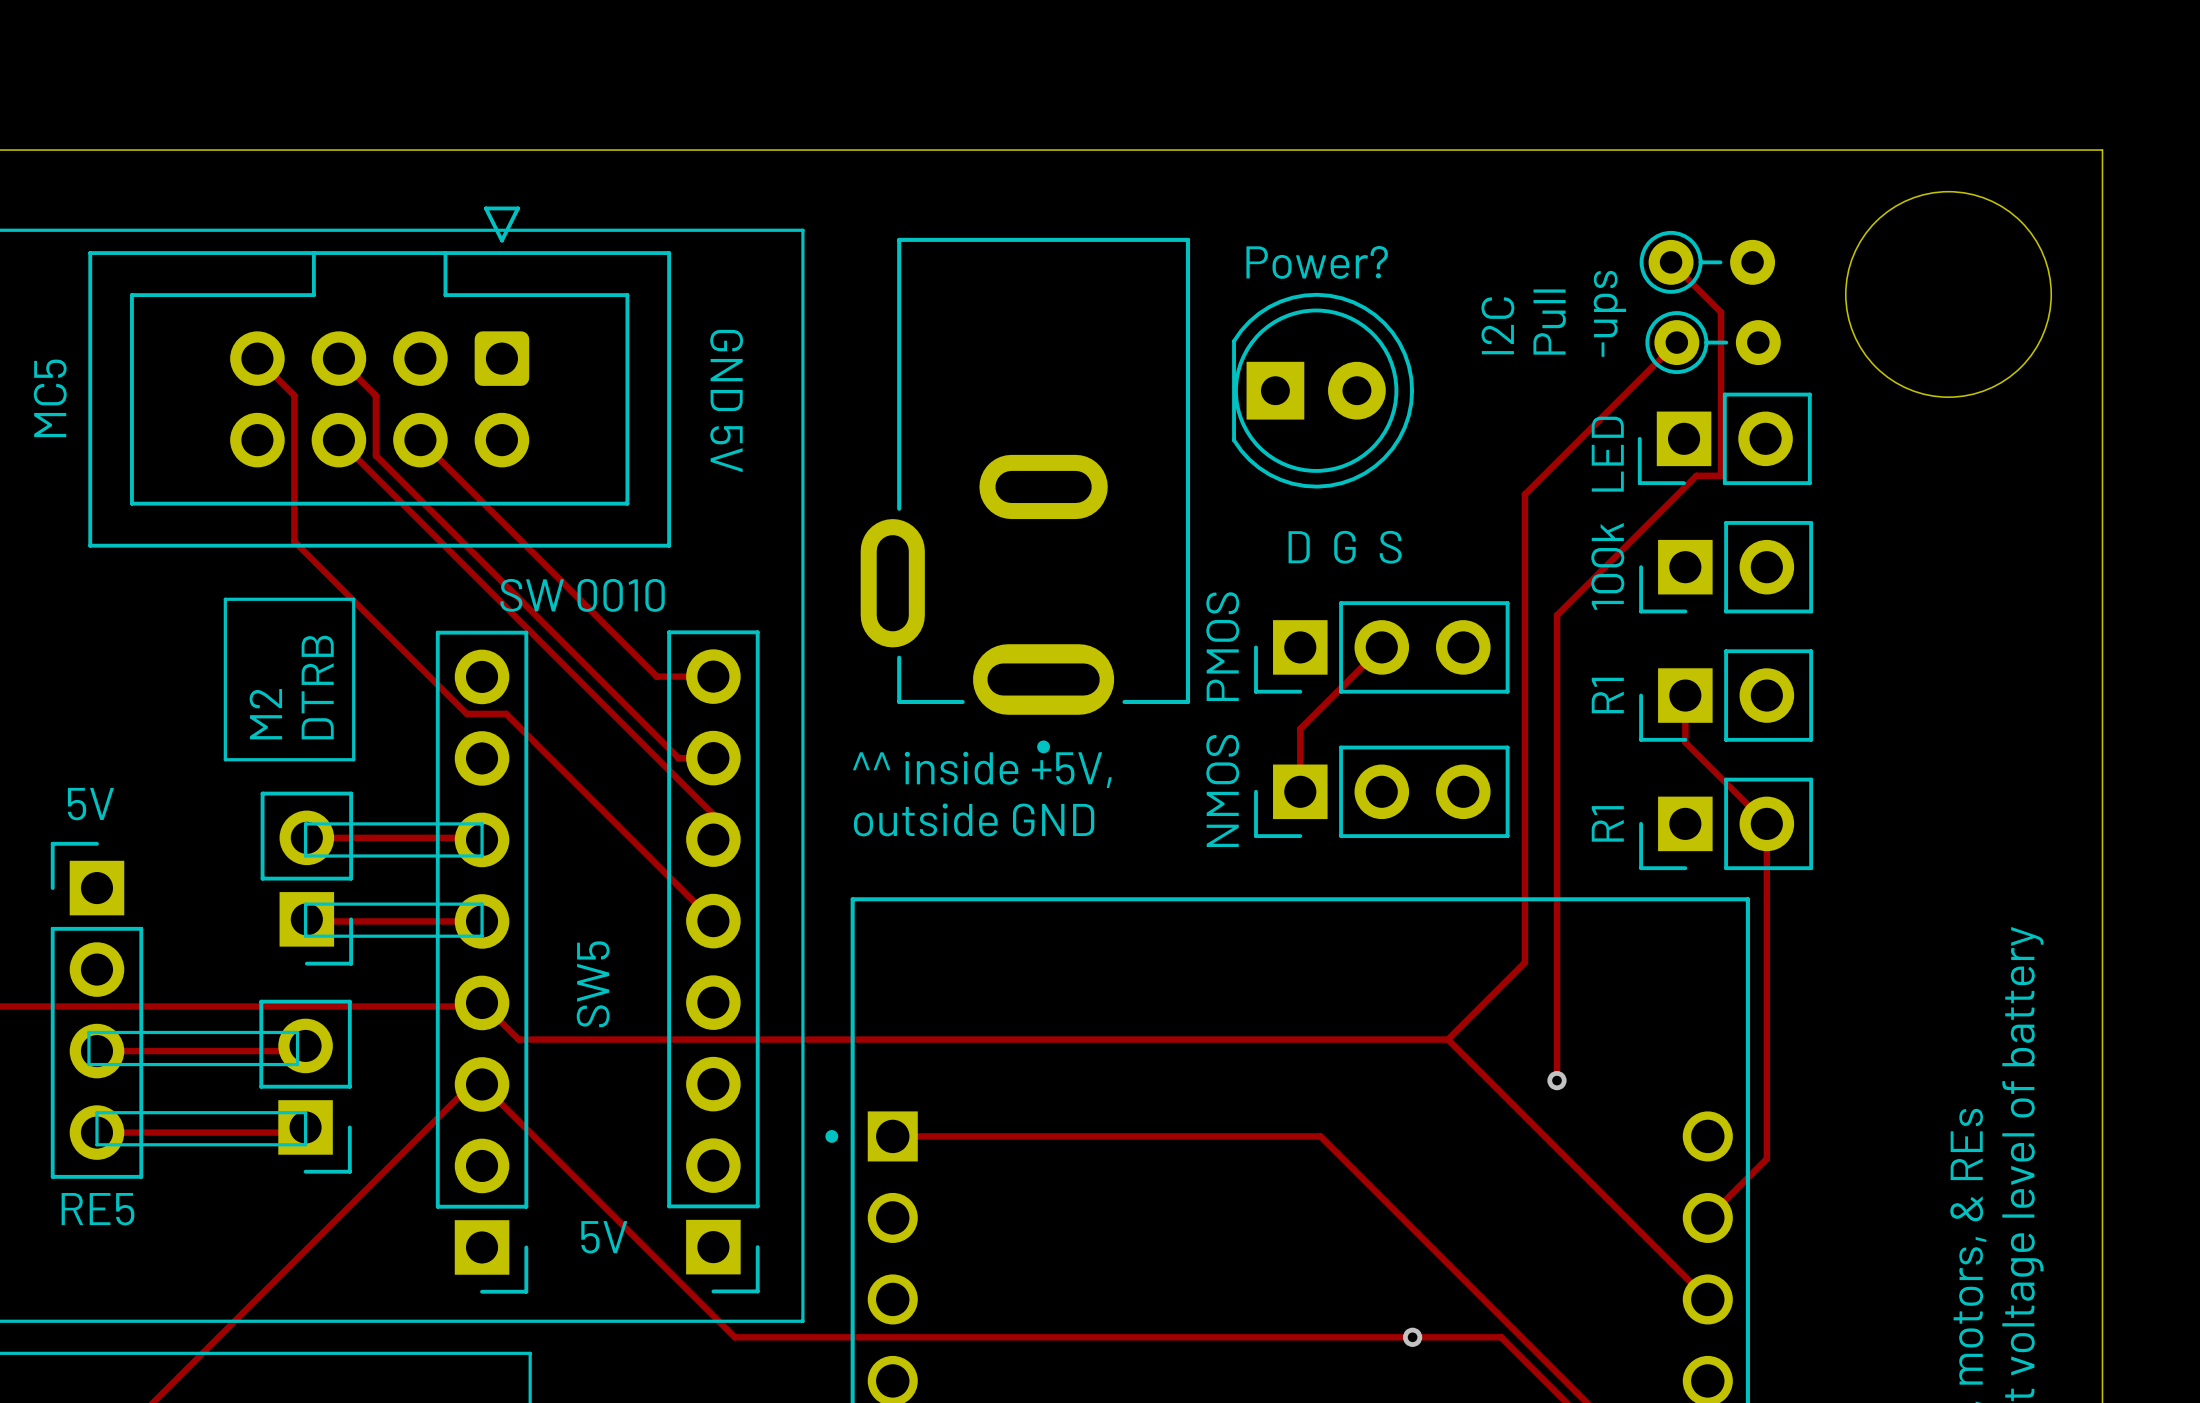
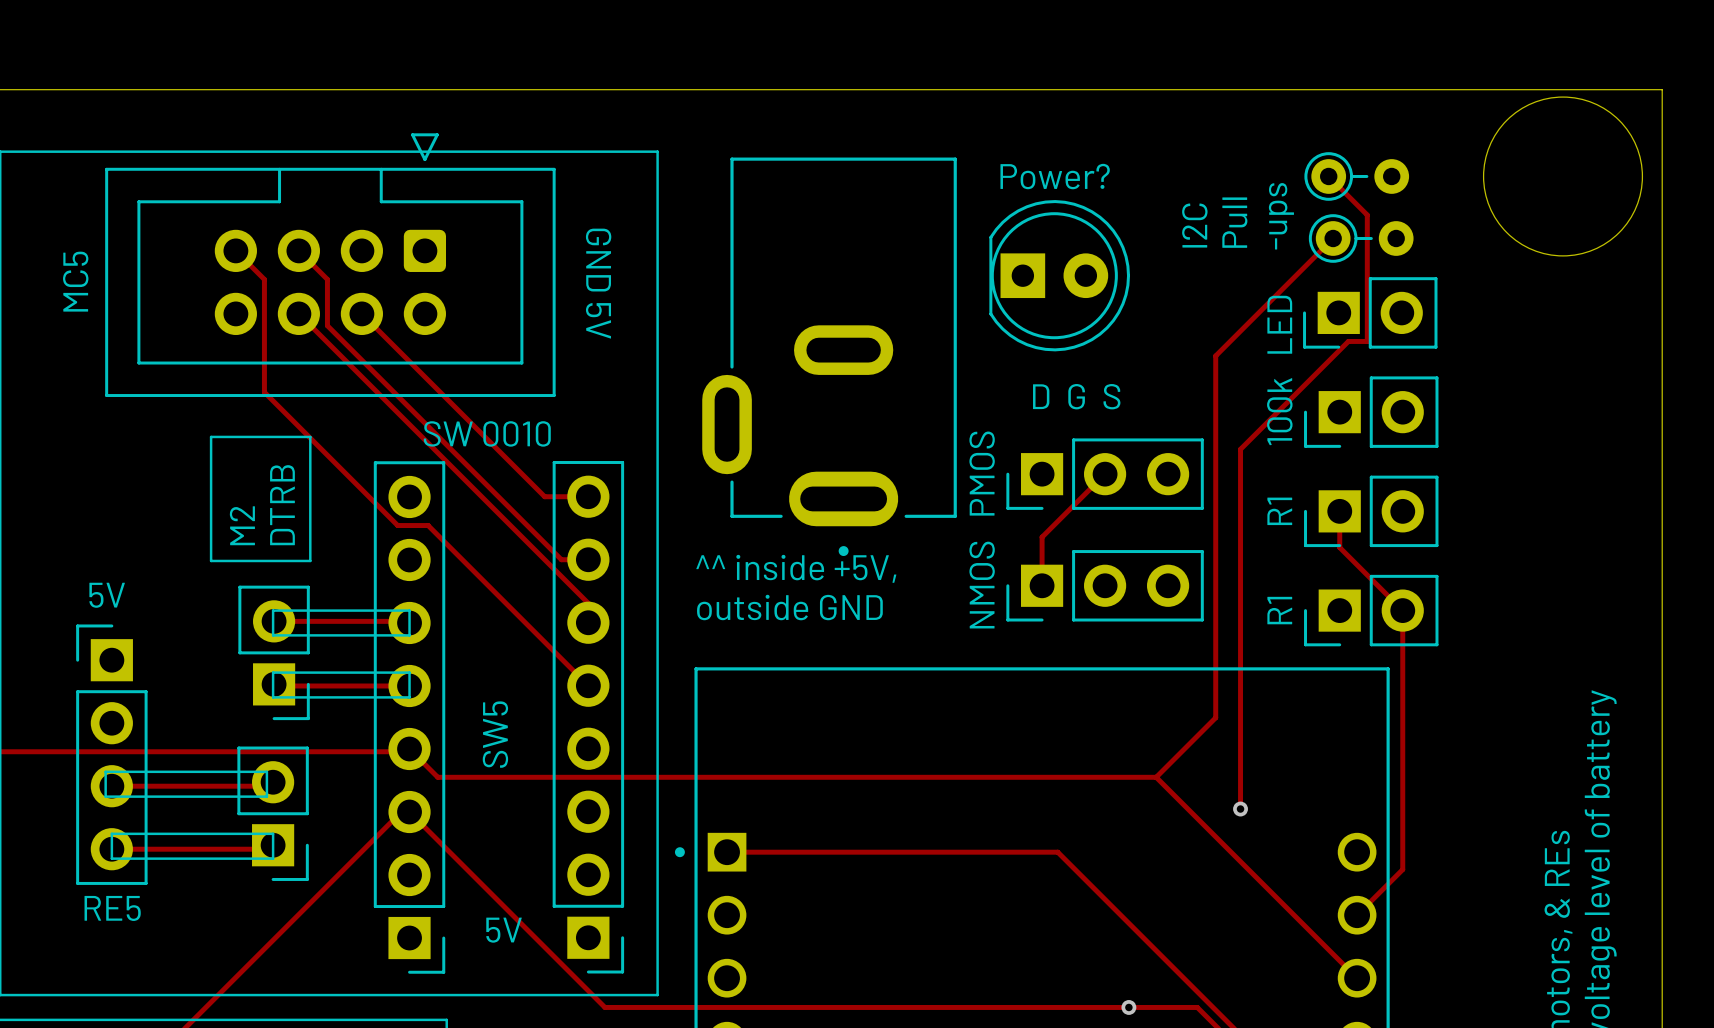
round board edge position: (1948, 294) -> (1563, 176)

